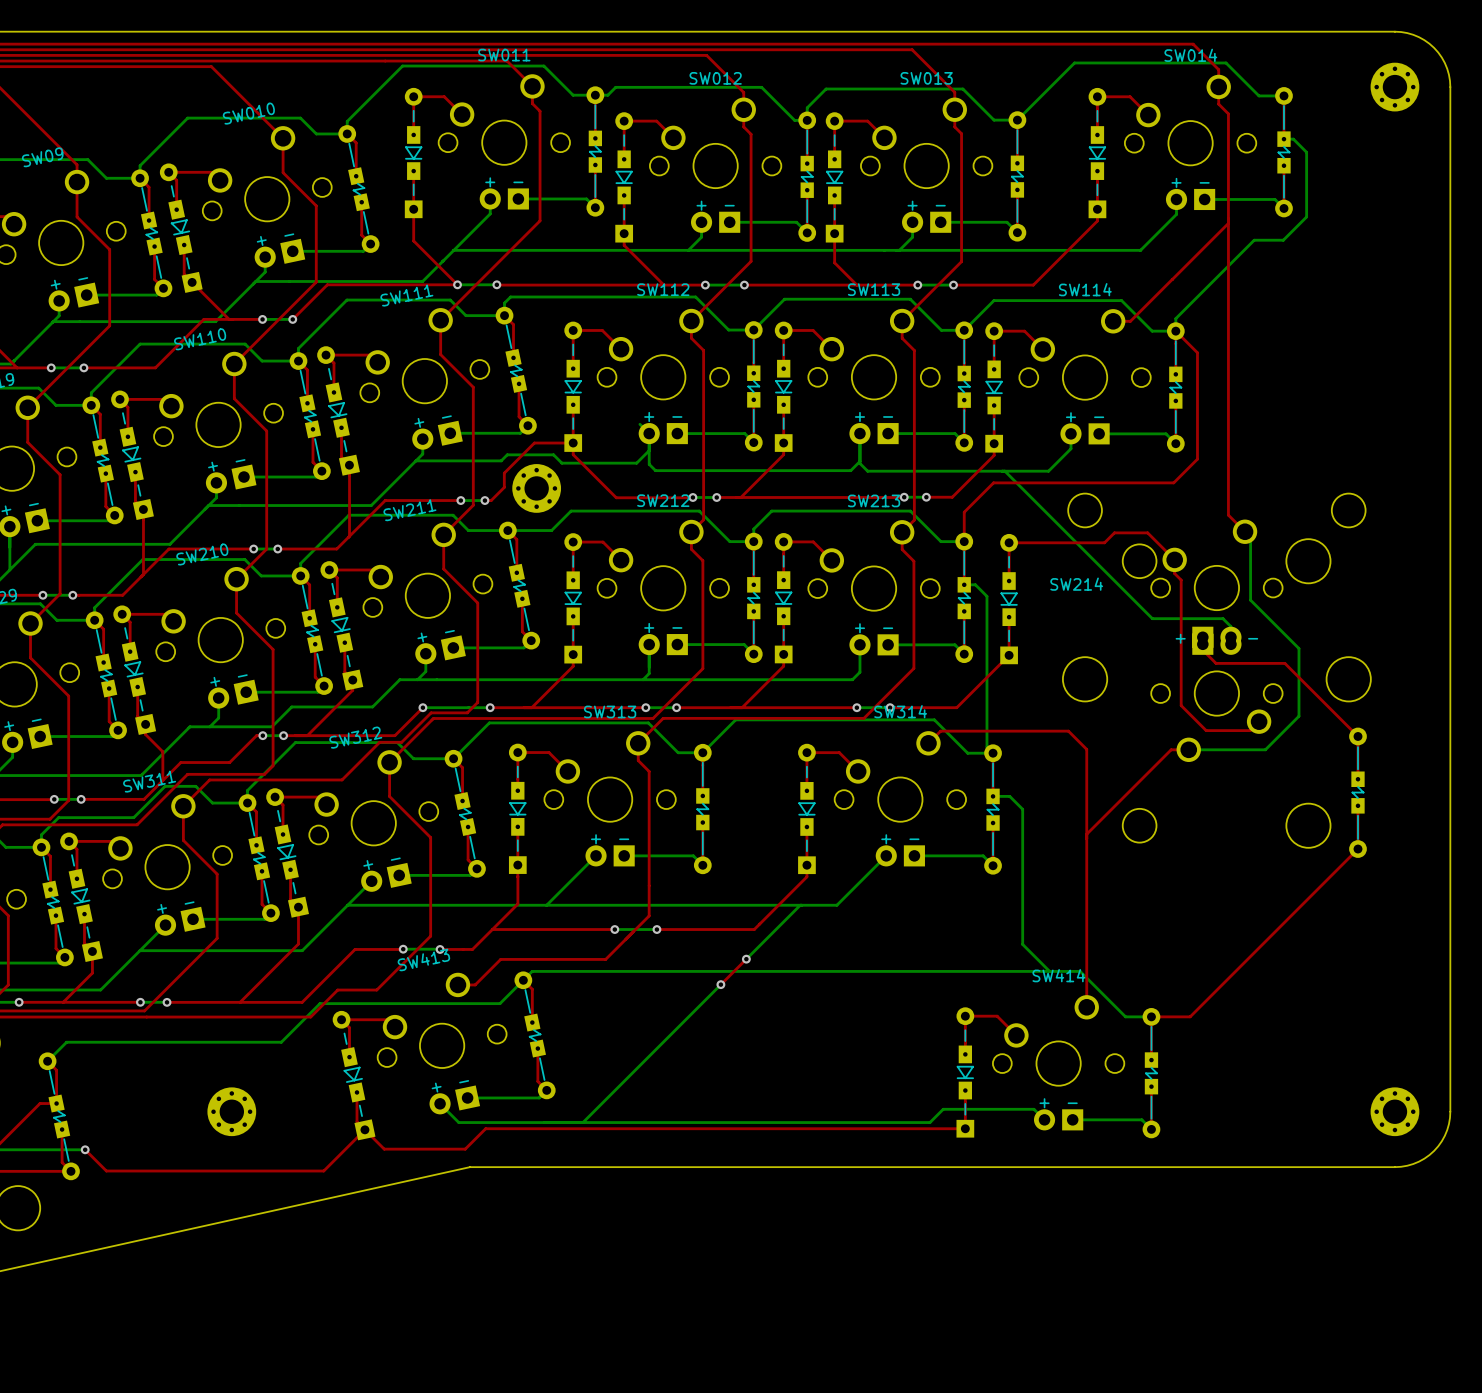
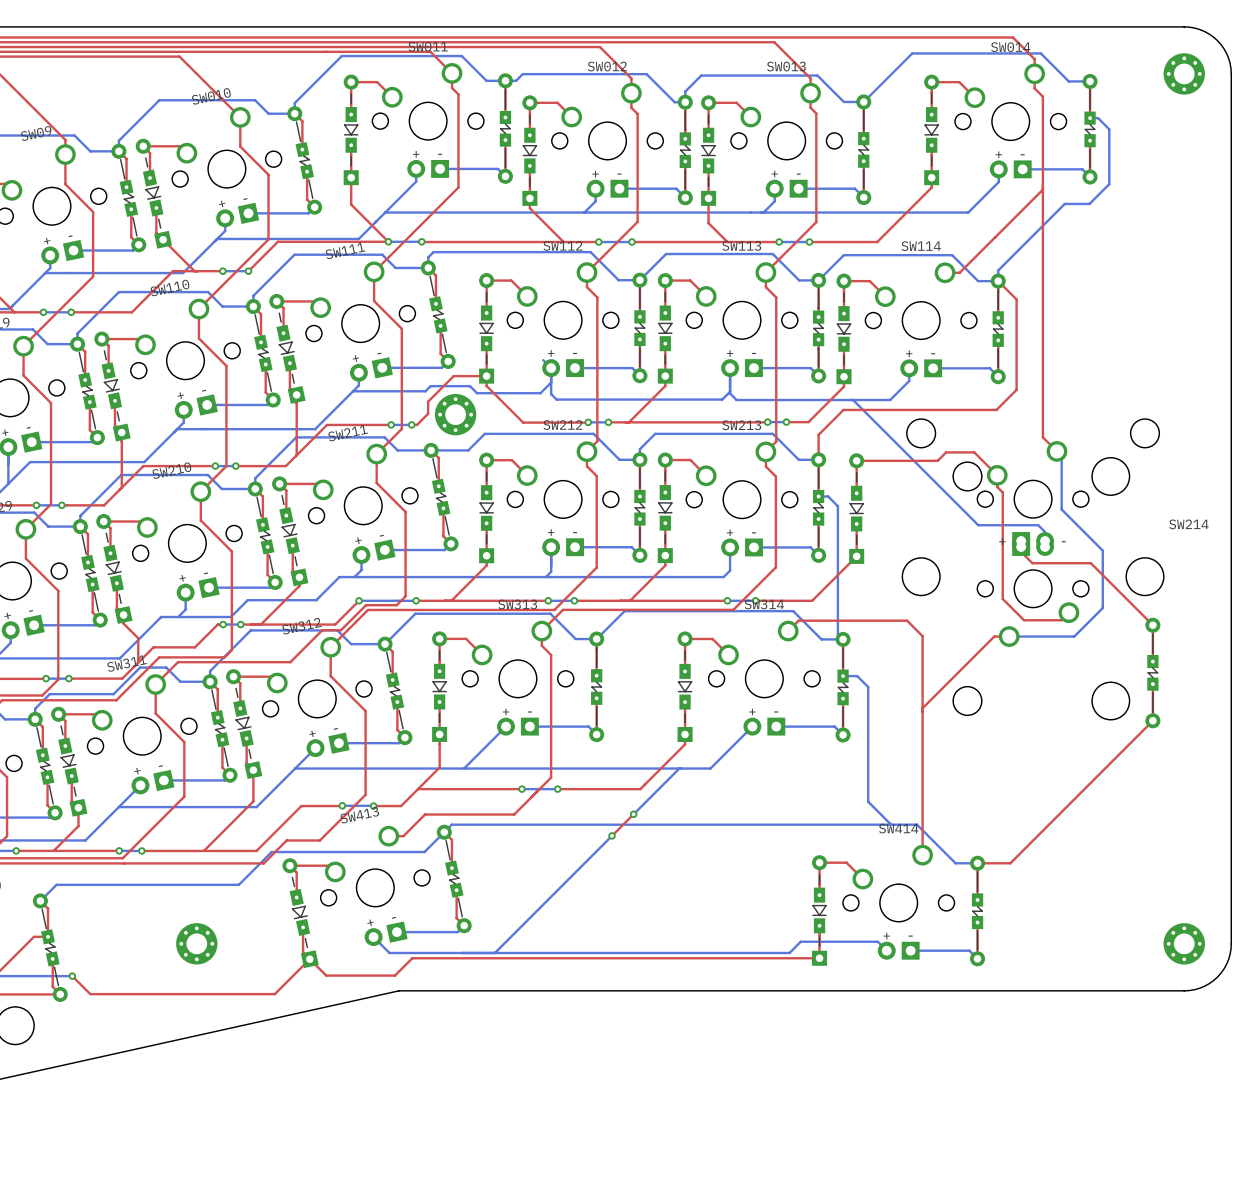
SW214 name position: SW214 (1076, 584) -> SW214 (1188, 524)

